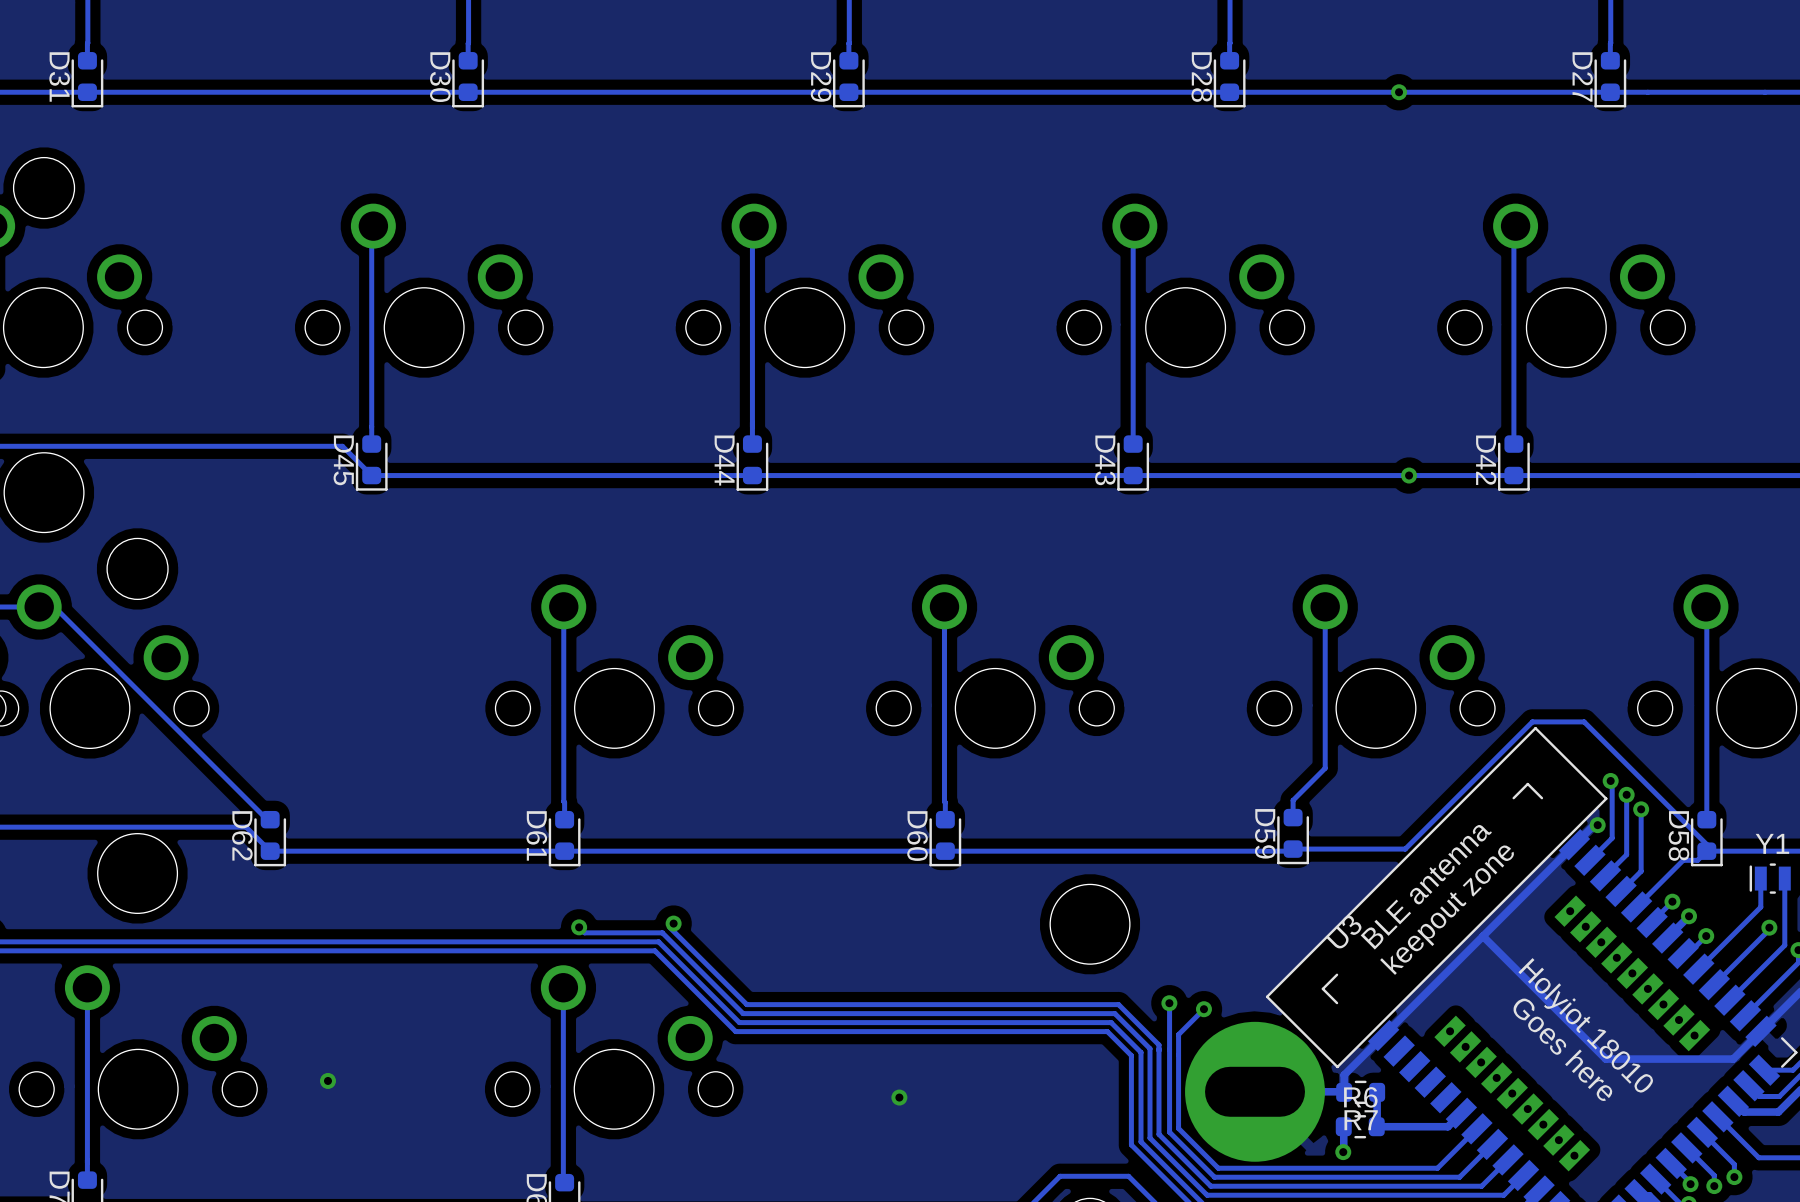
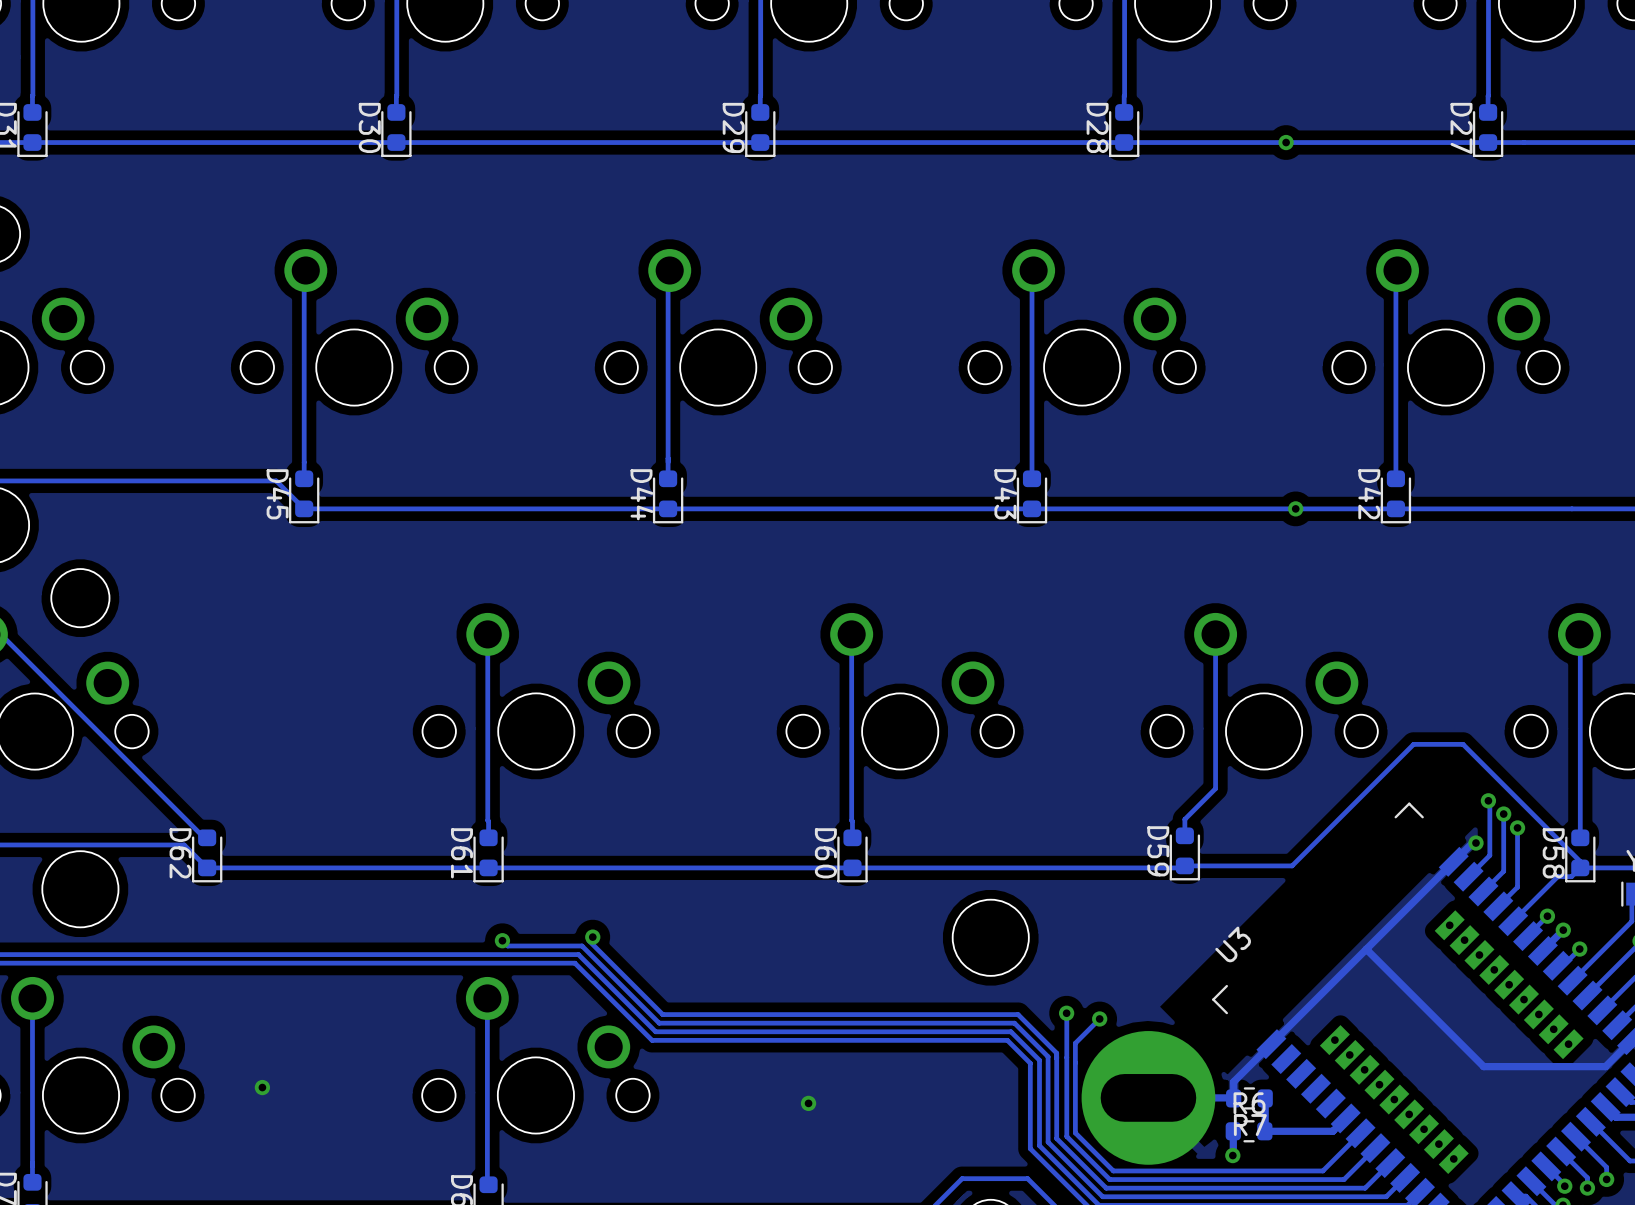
line: (1535, 728) (1606, 798) (1337, 1066) (1267, 996) (1535, 728) -> none
text: BLE antenna (1426, 887) -> none
text: keepout zone (1447, 908) -> none
text: Holyiot 18010 (1585, 1025) -> none
text: Goes here (1564, 1050) -> none

